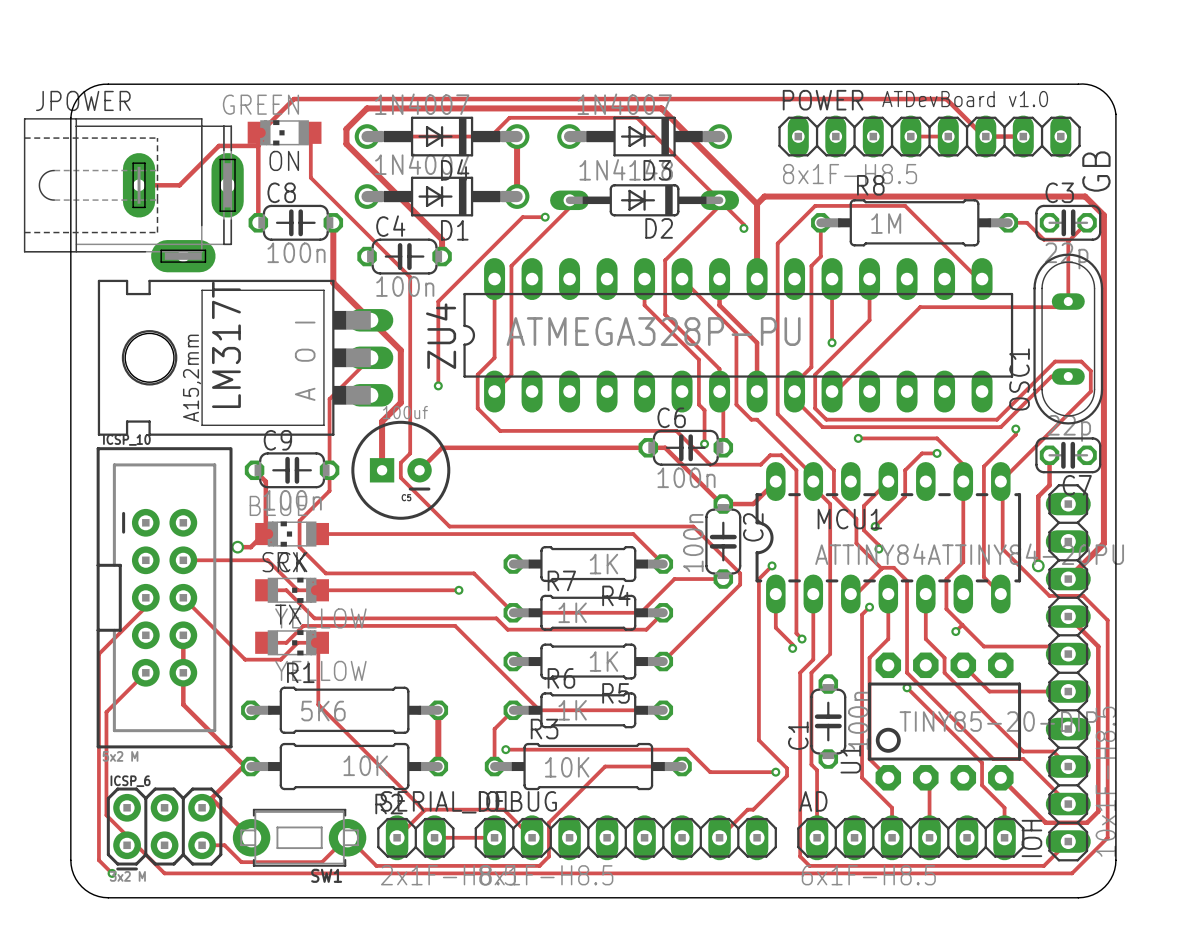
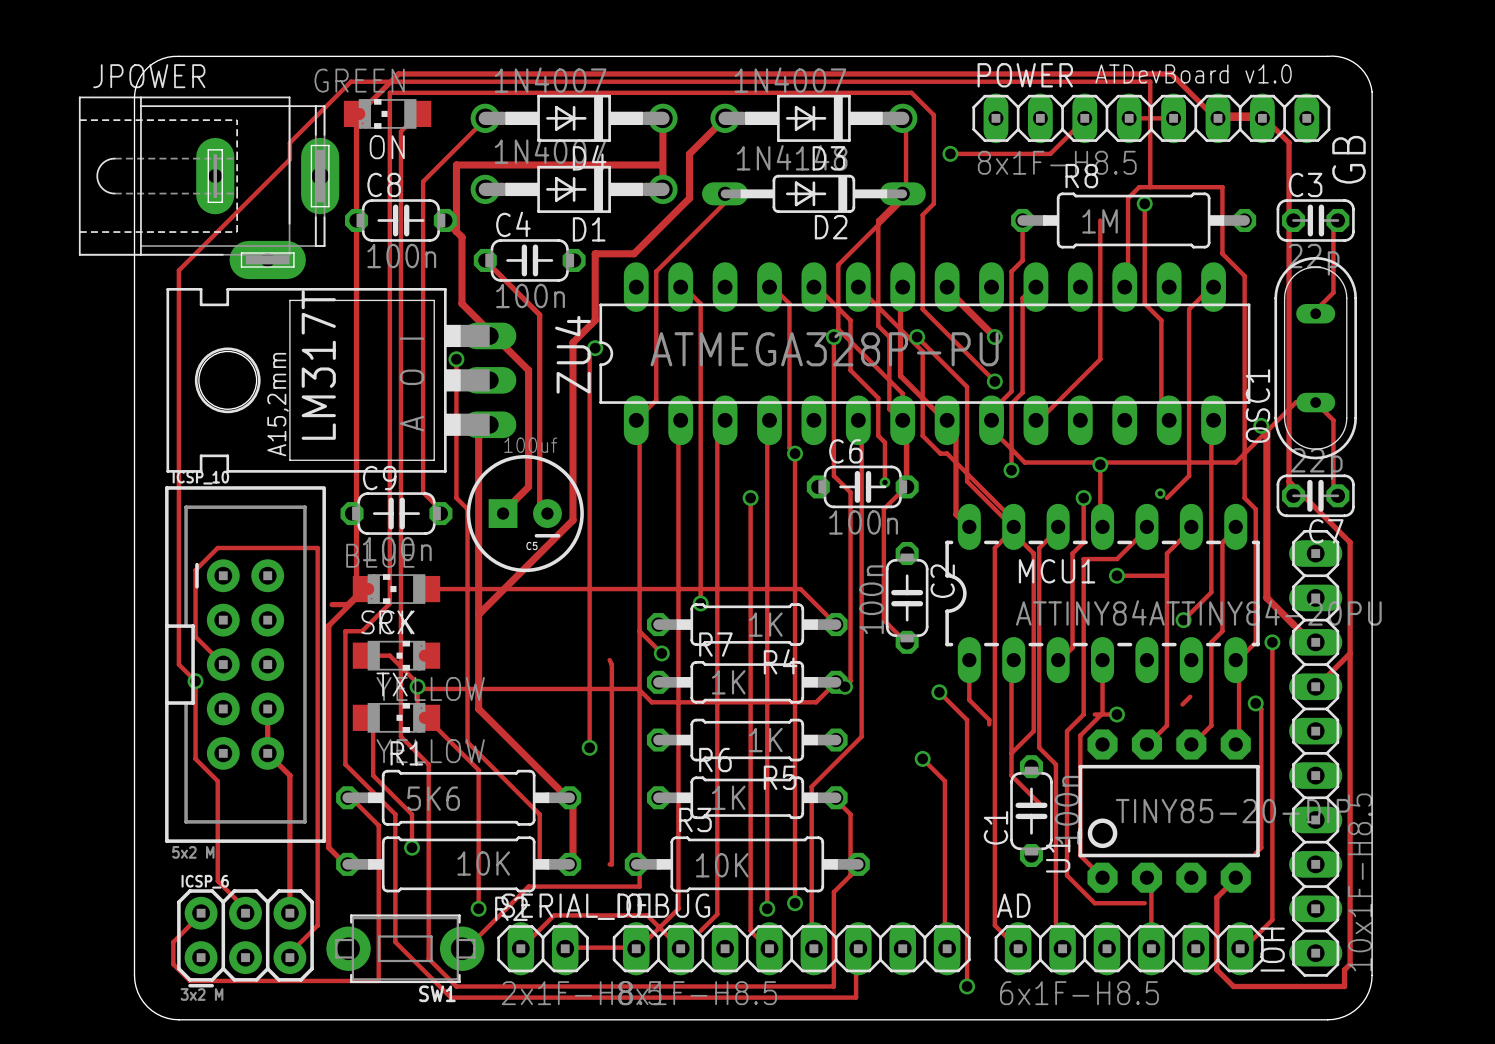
track: (310, 132) (310, 177) (410, 277) (410, 453) (400, 462) (400, 477) (449, 526) (693, 526) (740, 573) (740, 584) (663, 661) -> (418, 113) (400, 131) (400, 736) (428, 764) (428, 958) (456, 986) (833, 986) (833, 892) (850, 875) (850, 814) (833, 797)
track: (367, 136) (490, 136) (509, 117) (637, 117) (743, 224) (743, 228) -> (485, 118) (423, 181) (423, 492) (439, 509) (440, 513)
track: none -> (725, 118) (689, 153) (689, 198) (634, 253) (595, 253) (595, 320) (573, 342) (573, 520) (478, 614)
track: none -> (1084, 118) (1050, 153) (950, 153)
track: (258, 145) (218, 145) (179, 185) (139, 185) -> none
via: none -> (950, 153)
track: none -> (661, 164) (456, 164) (456, 231)
track: none -> (1150, 187) (1150, 81) (350, 81) (289, 142) (289, 159) (178, 270) (178, 664) (195, 681) (195, 758) (217, 781) (217, 881) (245, 908) (245, 913)
track: (757, 204) (757, 279) -> (994, 337) (950, 292) (950, 287) (947, 287)
track: (757, 204) (764, 196) (1085, 196) (1103, 215) (1103, 543) (1068, 579) -> (1261, 425) (1266, 431) (1266, 597) (1311, 642) (1315, 642)
track: (757, 204) (661, 108) (367, 108) (346, 129) (346, 144) (442, 239) (442, 256) -> none
track: none -> (1144, 203) (1144, 303) (1161, 320) (1161, 414) (1169, 420)
via: none -> (1144, 203)
track: (545, 217) (522, 217) (438, 301) (438, 385) -> none
via: (545, 217) -> none
track: (333, 222) (333, 282) (400, 350) (400, 402) (382, 421) (382, 470) -> (445, 220) (461, 237) (461, 303) (528, 370) (528, 486) (503, 513)
track: (1008, 222) (1027, 222) (1043, 239) (1069, 240) -> none
track: (1087, 222) (1068, 241) (1068, 301) (1062, 307) (920, 307) (834, 391) -> (1100, 220) (1100, 359) (1039, 420)
track: none -> (1337, 220) (1333, 220) (1333, 292) (1316, 309) (1315, 313)
via: (743, 228) -> none
track: (494, 279) (494, 357) (477, 374) (477, 408) (500, 430) (676, 430) (710, 464) (760, 464) (770, 455) (781, 455) (796, 470) (796, 633) (802, 639) -> none
track: none -> (680, 287) (684, 287) (700, 303) (700, 603)
track: none -> (769, 287) (772, 287) (789, 303) (789, 448) (795, 453) (795, 903)
track: (644, 279) (644, 305) (698, 359) (698, 372) -> (813, 287) (817, 287) (850, 320) (850, 370) (878, 398)
track: (719, 279) (719, 305) (757, 342) (757, 391) -> (902, 287) (900, 287) (900, 375) (944, 420) (950, 420) (956, 425) (956, 514) (969, 526)
track: (832, 279) (832, 342) -> (1035, 287) (1022, 298) (1022, 392) (1011, 403) (1011, 470)
track: (869, 279) (869, 320) (815, 374) (815, 408) (826, 419) (997, 419) (1055, 361) (1081, 361) (1090, 370) (1090, 391) (1000, 481) (1002, 481) (1002, 549) (1049, 595) (1083, 595) (1107, 620) (1107, 837) (1072, 873) (164, 873) (136, 845) (127, 845) (127, 835) (106, 815) (106, 712) (145, 672) -> none
track: none -> (1124, 287) (1128, 287) (1128, 198) (1139, 187) (1222, 187) (1222, 253) (1244, 276) (1244, 498) (1255, 509) (1255, 642) (1235, 660) (1239, 664) (1239, 742) (1235, 744)
track: (980, 279) (905, 205) (815, 205) (777, 243) (777, 414) (833, 470) (833, 496) (856, 519) (856, 543) (881, 568) -> (1211, 287) (1189, 309) (1189, 475) (1166, 498)
track: none -> (833, 337) (833, 475) (850, 492) (850, 681) (844, 686)
via: none -> (833, 337)
track: none -> (917, 337) (967, 387) (967, 481) (1013, 526) (994, 547) (994, 925) (1018, 948)
via: none -> (917, 337)
via: none -> (994, 337)
track: none -> (595, 348) (589, 353) (589, 747)
via: none -> (595, 348)
track: none -> (456, 359) (456, 498) (467, 509) (467, 742) (539, 814) (539, 864)
via: none -> (456, 359)
via: (832, 342) -> none
track: (370, 357) (329, 399) (329, 490) (299, 520) (299, 547) (325, 573) (473, 573) (513, 612) (640, 612) (674, 579) (722, 579) -> (902, 118) (906, 120) (906, 192) (902, 193) (878, 220) (878, 325) (889, 337) (889, 409) (900, 420) (906, 420) (906, 486) (883, 509) (883, 620) (906, 642)
track: none -> (994, 381) (922, 309) (922, 214) (933, 203) (933, 115) (911, 92) (389, 92) (389, 603) (362, 631) (345, 631) (345, 764) (395, 814) (395, 942) (450, 997) (856, 997) (856, 953) (858, 948)
via: none -> (994, 381)
track: none -> (1315, 402) (1333, 420) (1333, 492) (1337, 495)
via: (438, 385) -> none
track: none -> (636, 420) (639, 420) (639, 886) (528, 886) (467, 947) (462, 948)
track: none -> (769, 420) (767, 420) (767, 908)
track: none -> (858, 420) (861, 420) (861, 736) (811, 786) (811, 947) (813, 948)
track: none -> (1213, 420) (1211, 420) (1211, 592) (1183, 620)
track: none -> (489, 424) (478, 436) (478, 614)
via: none -> (1261, 425)
via: none -> (795, 453)
via: none -> (1100, 464)
track: (1015, 429) (1015, 434) (983, 466) (983, 577) (1000, 594) -> none
via: (1015, 429) -> none
via: none -> (1011, 470)
track: (858, 438) (937, 438) (963, 464) (963, 562) (946, 579) (946, 609) (983, 646) (1060, 646) (1068, 654) -> none
via: (858, 438) -> none
track: (937, 453) (922, 453) (905, 470) (905, 496) (875, 526) -> none
track: (1049, 455) (1049, 485) (1038, 496) (1038, 565) -> (1293, 495) (1289, 492) (1289, 142) (1262, 118) (1261, 115) (1222, 115) (1218, 118)
track: none -> (750, 498) (750, 930) (769, 948)
via: none -> (750, 498)
via: none -> (1083, 498)
track: (254, 470) (265, 481) (265, 534) -> none
track: (419, 470) (442, 447) (665, 447) (721, 504) (753, 504) (775, 481) -> (547, 513) (539, 503) (539, 314) (485, 260)
track: none -> (1058, 526) (1039, 547) (1039, 747) (1055, 764) (1055, 942) (1062, 948)
track: (888, 481) (863, 505) (863, 530) (878, 545) (878, 549) -> (1102, 526) (1100, 525) (1100, 464)
track: none -> (1146, 526) (1116, 559) (1083, 559) (1083, 714) (1067, 731) (1067, 875) (1094, 903) (1144, 903)
track: none -> (1191, 526) (1166, 553) (1166, 725) (1146, 744)
track: none -> (1116, 575) (1166, 575)
via: none -> (1116, 575)
via: (875, 526) -> none
via: none -> (700, 603)
via: (237, 547) -> none
via: (878, 549) -> none
track: (183, 560) (267, 560) (297, 590) (458, 590) -> none
via: none -> (1183, 620)
track: (772, 565) (758, 579) (758, 740) (787, 768) (787, 775) (753, 809) (747, 809) (719, 837) -> none
via: (772, 565) -> none
via position: (1038, 565) -> (1272, 642)
track: none -> (639, 631) (661, 653)
via: none -> (661, 653)
track: none -> (1350, 653) (1315, 686)
via: (458, 590) -> none
track: none -> (609, 660) (611, 664) (611, 864) (609, 864)
track: (813, 594) (813, 659) (800, 672) (800, 856) (809, 865) (1043, 865) (1068, 841) -> (1013, 660) (1011, 664) (1011, 753)
track: (850, 594) (856, 594) (882, 567) (893, 567) (907, 580) (907, 672) (993, 759) (1023, 759) (1068, 804) -> (1058, 660) (1072, 647) (1072, 553) (1083, 542) (1083, 498)
track: (925, 594) (925, 639) (944, 657) (944, 672) (1023, 751) (1053, 751) (1068, 766) -> none
track: (145, 597) (145, 607) (98, 654) (98, 860) (112, 873) -> (223, 664) (195, 636) (195, 570) (217, 547) (317, 547) (317, 925) (289, 953) (289, 957)
track: (183, 597) (245, 659) (280, 659) (297, 642) (318, 642) (318, 704) (424, 810) -> none
track: (869, 607) (862, 614) (862, 777) (892, 807) (892, 837) -> none
via: (869, 607) -> none
via: none -> (195, 681)
track: none -> (417, 686) (417, 708) (478, 770) (478, 908)
via: none -> (417, 686)
via: none -> (844, 686)
track: (1068, 616) (1098, 646) (1098, 811) (1087, 822) (1045, 822) (1000, 777) -> (1289, 481) (1350, 542) (1350, 964) (1344, 969) (1344, 986) (1233, 986) (1216, 969) (1216, 897) (1235, 877)
track: none -> (939, 692) (967, 720) (967, 986)
via: none -> (939, 692)
track: none -> (1255, 703) (1261, 708) (1261, 847) (1255, 853)
via: none -> (1255, 703)
via: (955, 631) -> none
via: (802, 639) -> none
track: none -> (1094, 714) (1116, 714)
via: none -> (1116, 714)
track: (266, 642) (286, 642) (303, 625) (455, 625) (539, 710) (659, 710) -> (365, 717) (373, 725) (373, 775) (412, 814) (412, 847)
via: (792, 648) -> none
track: (963, 665) (989, 691) (1068, 691) -> (1191, 744) (1211, 725) (1211, 642) (1222, 631) (1222, 542) (1235, 526)
via: none -> (589, 747)
track: (183, 672) (183, 704) (243, 764) (250, 766) -> (267, 753) (289, 775) (289, 913)
track: none -> (922, 758) (944, 781) (944, 947) (947, 948)
via: none -> (922, 758)
track: (907, 687) (982, 762) (982, 785) (1004, 807) (1004, 837) -> (1272, 642) (1272, 919) (1244, 947) (1240, 948)
via: (907, 687) -> none
track: (811, 691) (811, 764) (817, 770) (817, 837) -> (1011, 775) (1039, 803)
track: none -> (347, 797) (350, 797) (378, 825) (378, 980) (190, 980) (173, 964) (173, 942) (201, 913)
track: (438, 710) (438, 766) -> (478, 614) (478, 708) (567, 797) (573, 797) (573, 864) (569, 864)
track: (513, 710) (494, 729) (494, 766) -> none
track: (505, 749) (687, 749) (710, 772) (775, 772) -> none
via: (505, 749) -> none
via: none -> (412, 847)
track: (248, 766) (243, 766) (202, 807) -> (345, 864) (328, 847) (328, 625) (365, 589) (356, 581) (356, 514) (352, 513) (356, 509) (356, 220)
track: (682, 766) (605, 766) (563, 808) -> (725, 420) (717, 425) (717, 914)
via: (775, 772) -> none
track: (211, 798) (251, 837) -> none
via: none -> (795, 903)
via: none -> (478, 908)
via: none -> (767, 908)
track: (548, 822) (548, 856) (539, 865) (376, 865) (348, 837) (322, 862) (241, 862) (224, 845) (202, 845) -> none
track: (434, 837) (494, 837) -> (565, 948) (639, 947) (678, 908) (678, 420) (680, 420)
via: none -> (967, 986)
via: (112, 873) -> none

